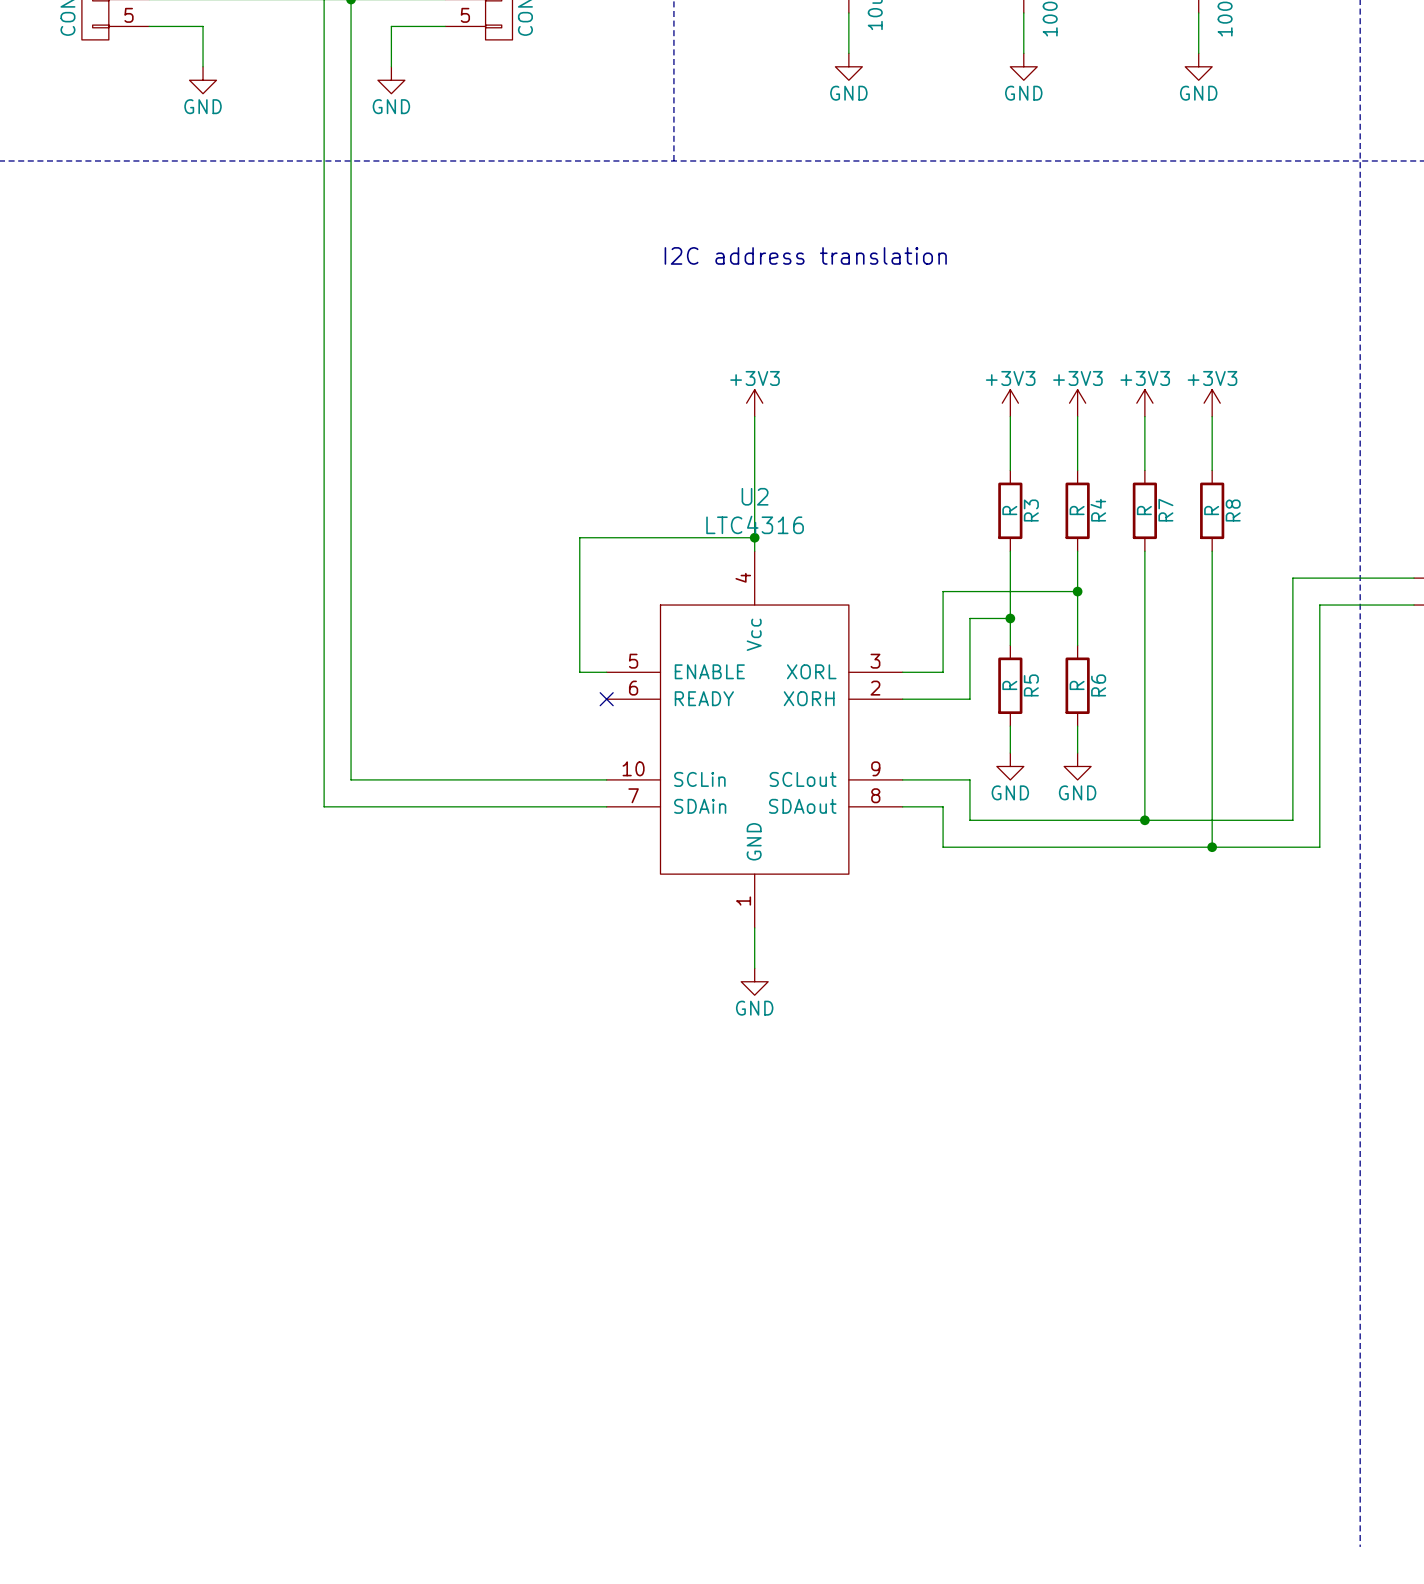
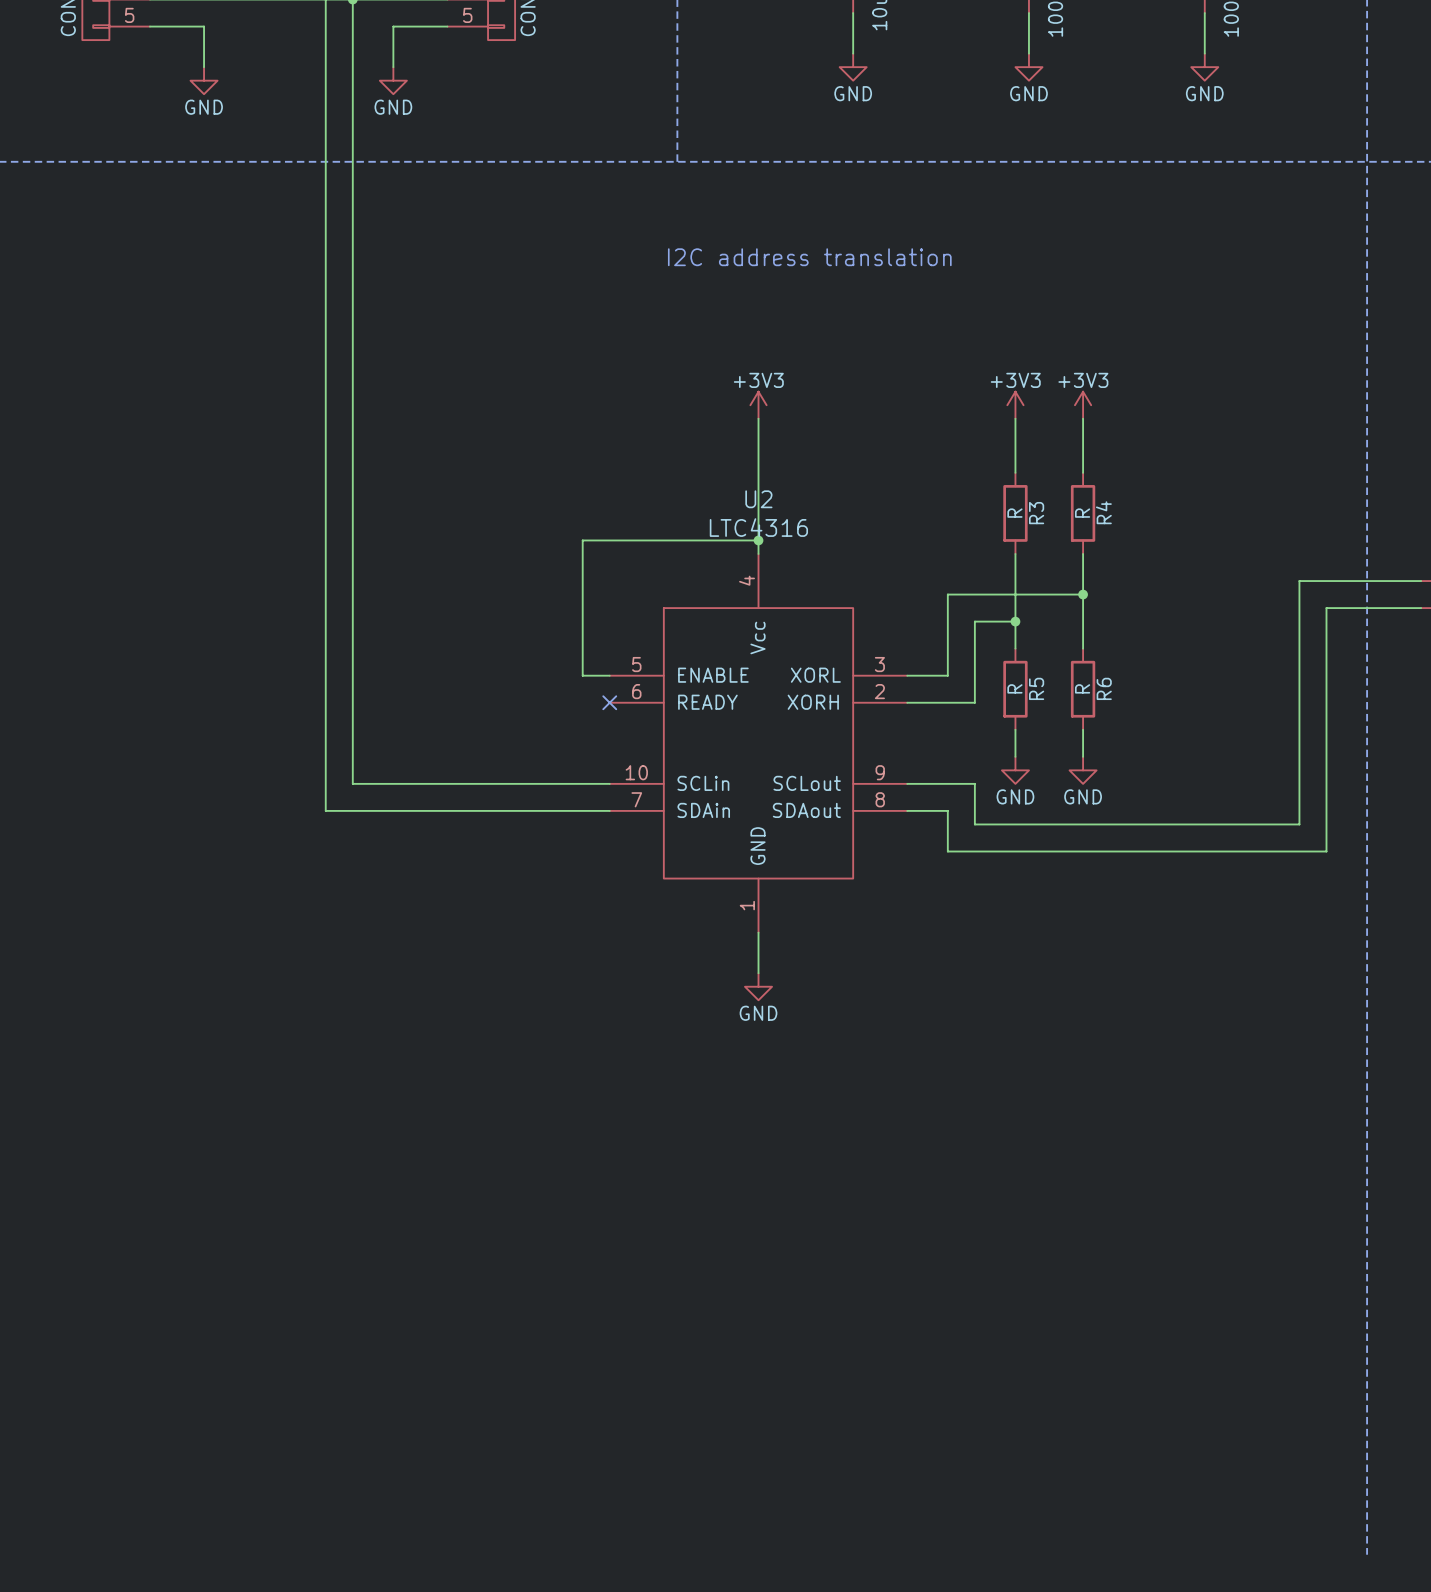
power symbol: +3V3 (1144, 403) -> none
power symbol: +3V3 (1212, 403) -> none
wire: (1144, 416) (1144, 470) -> none
wire: (1212, 416) (1212, 470) -> none
R7: R (1144, 510) -> none
R8: R (1212, 510) -> none
wire: (1144, 551) (1144, 820) -> none
wire: (1212, 551) (1212, 847) -> none
junction: (1144, 820) -> none
junction: (1212, 847) -> none

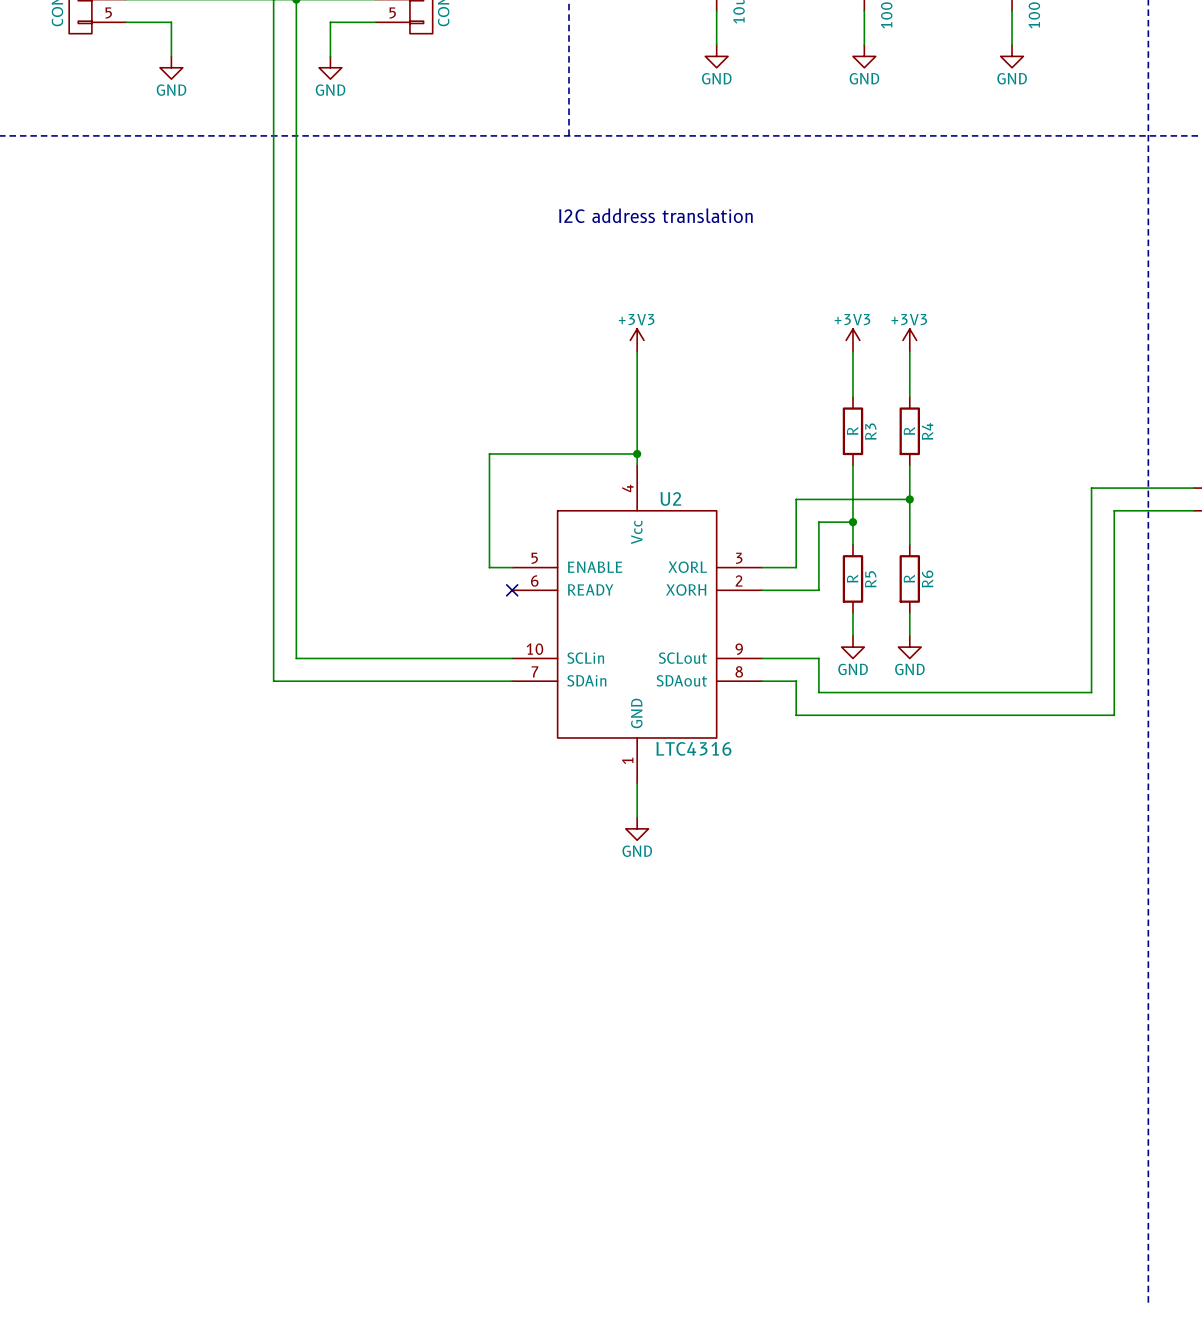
U2 name position: U2 (758, 499) -> U2 (670, 499)
U2 value position: LTC4316 (758, 527) -> LTC4316 (693, 748)

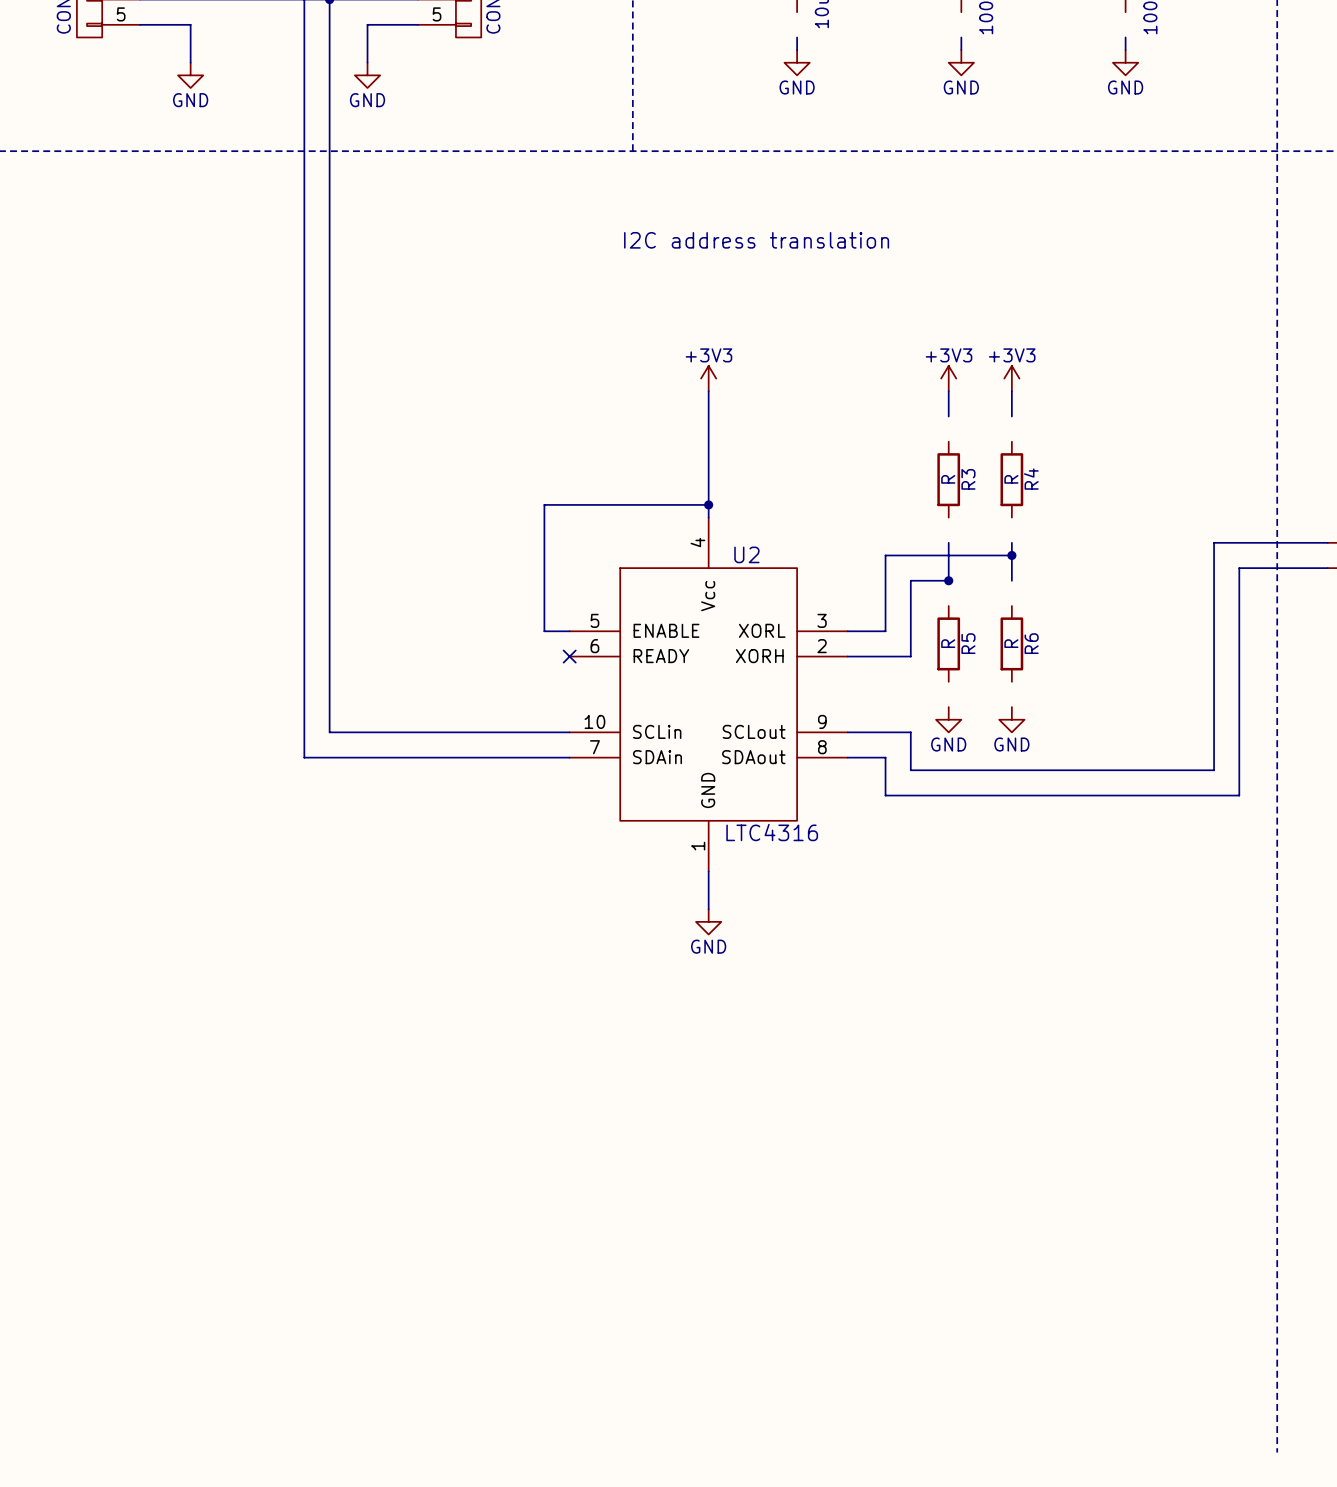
wire: (716, 10) (716, 33) -> none
wire: (864, 10) (864, 33) -> none
wire: (1012, 10) (1012, 33) -> none
wire: (852, 374) (852, 397) -> none
wire: (909, 374) (909, 397) -> none
wire: (852, 465) (852, 488) -> none
wire: (909, 465) (909, 488) -> none
wire: (852, 522) (852, 544) -> none
wire: (909, 522) (909, 544) -> none
wire: (852, 613) (852, 635) -> none
wire: (909, 613) (909, 635) -> none

